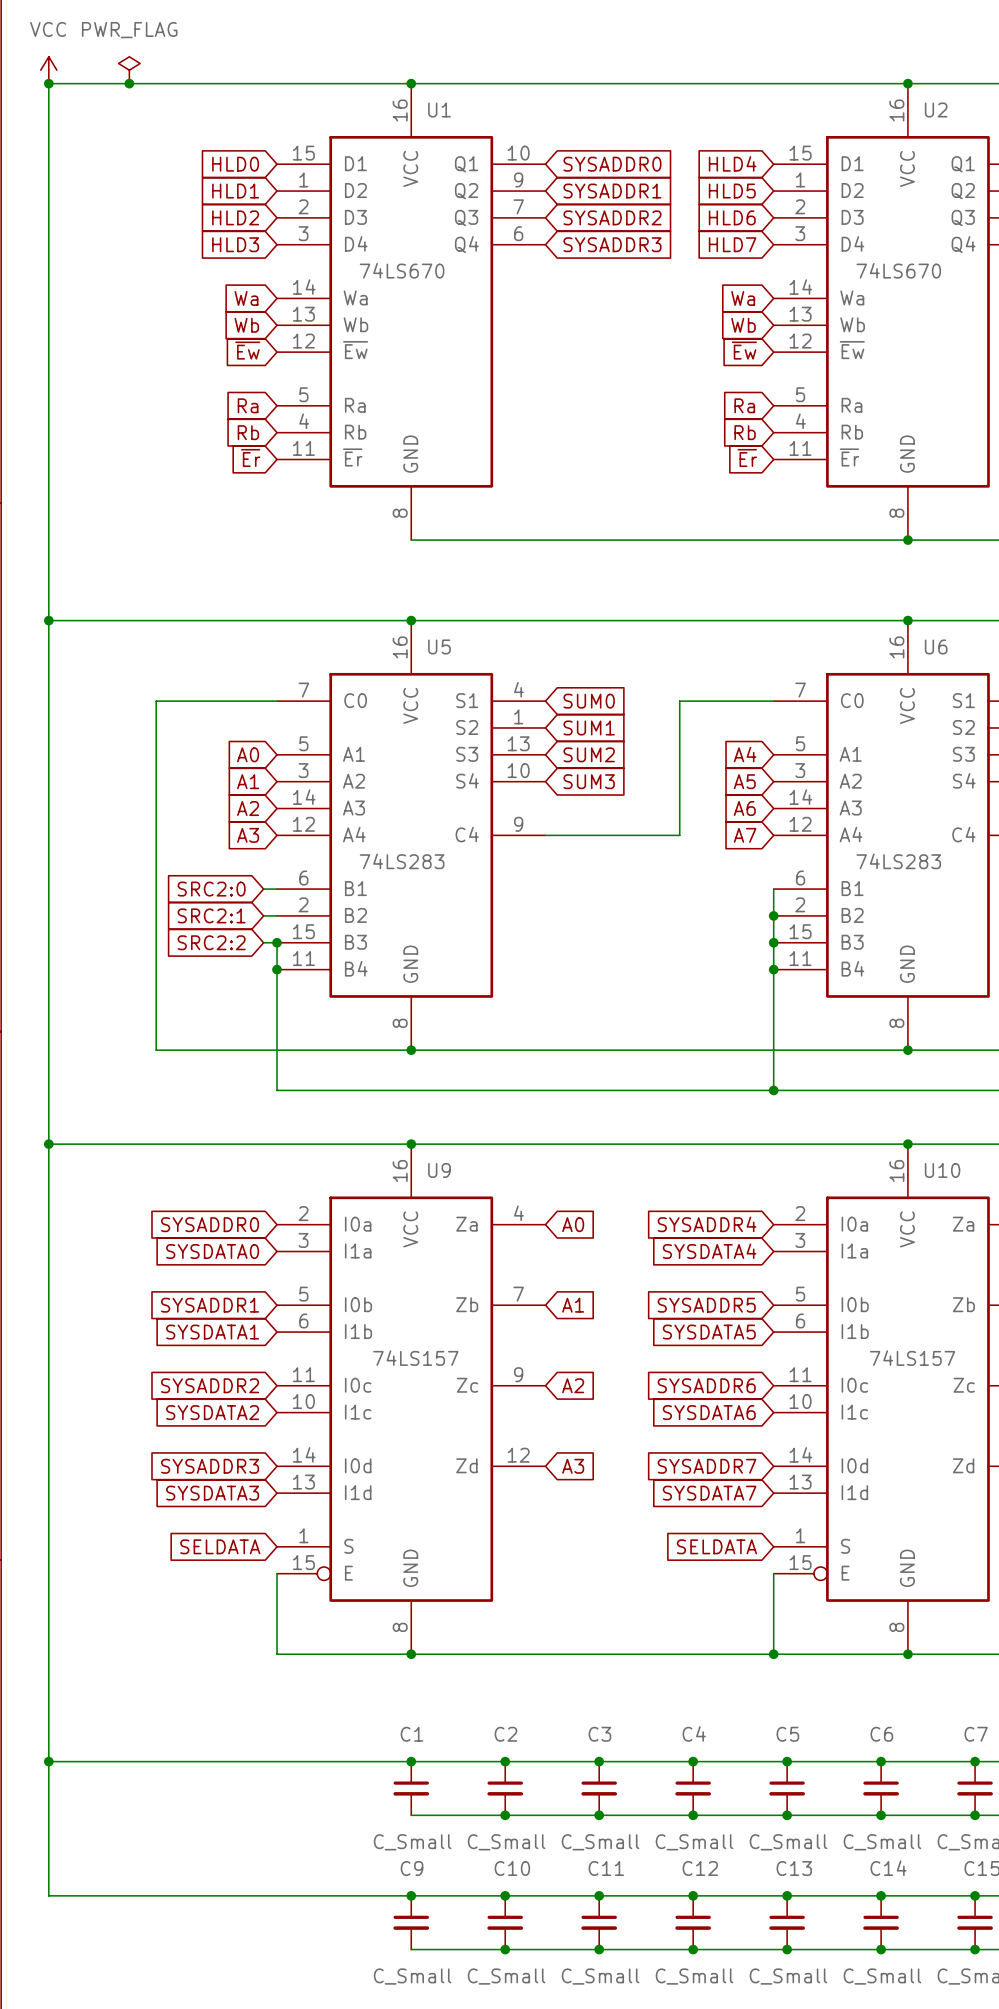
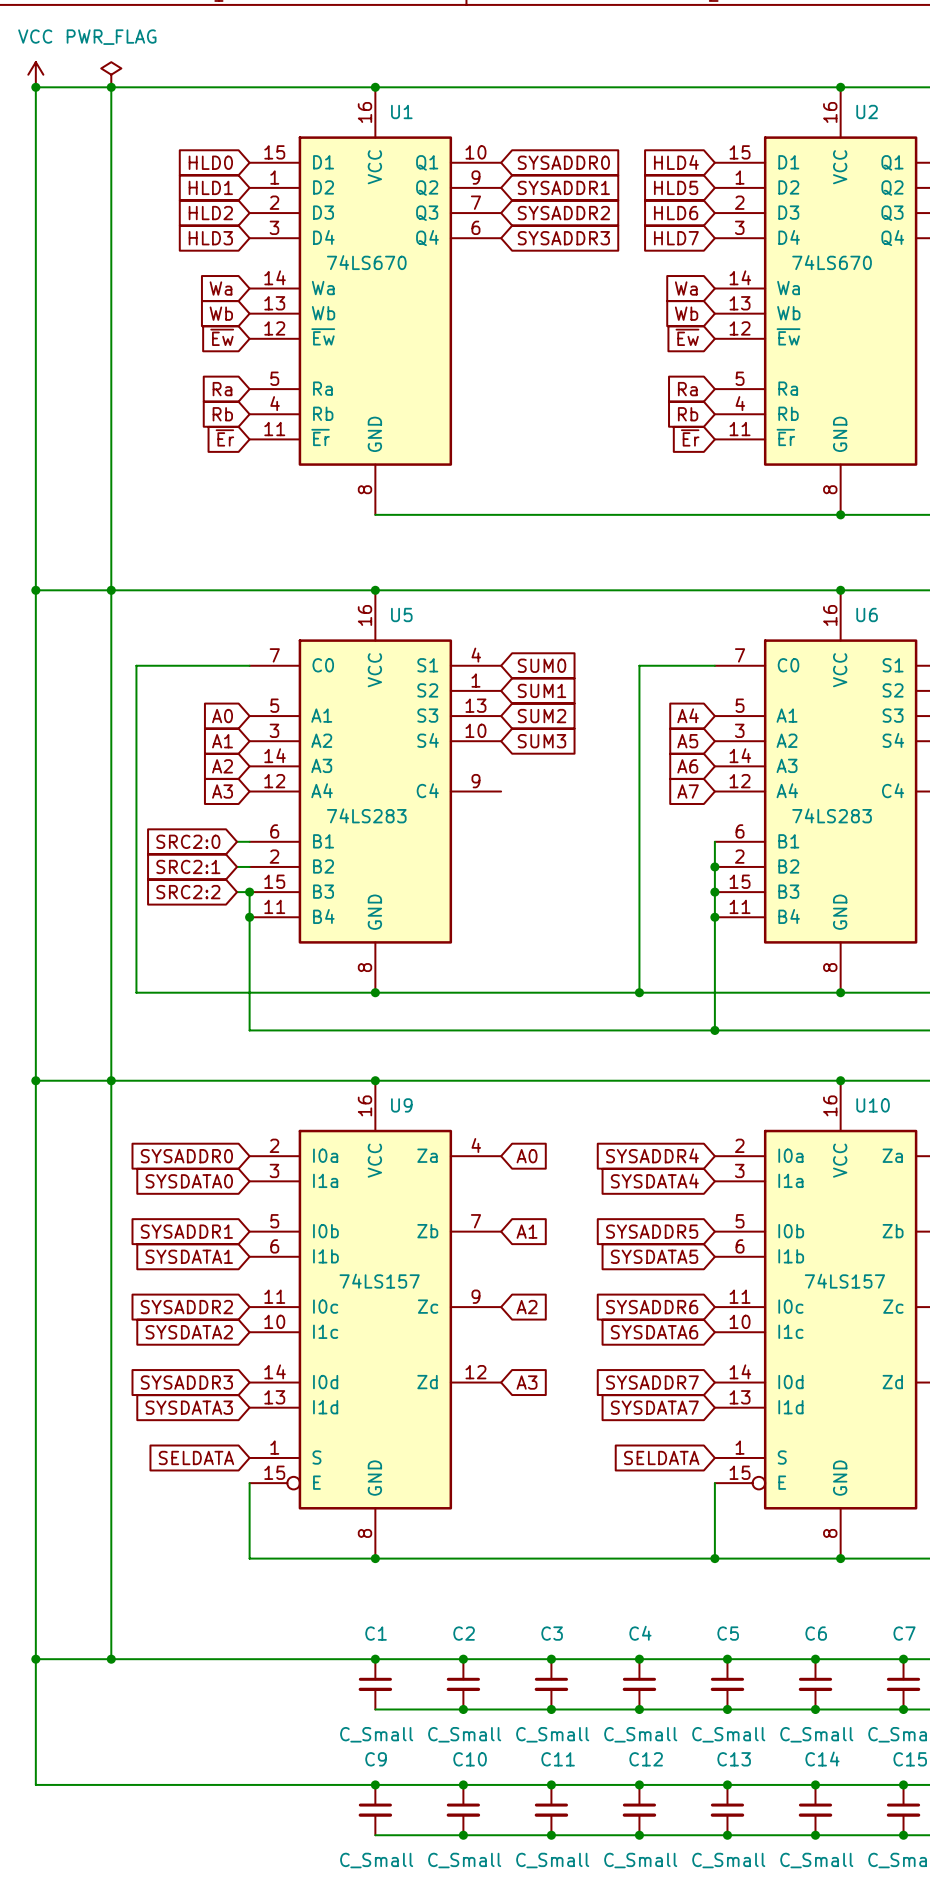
wire: none -> (111, 87) (111, 1659)
junction: none -> (111, 590)
wire: (693, 701) (679, 701) (679, 835) (545, 835) -> (639, 665) (639, 992)
junction: none -> (639, 992)
junction: none -> (111, 1080)
junction: none -> (111, 1659)

